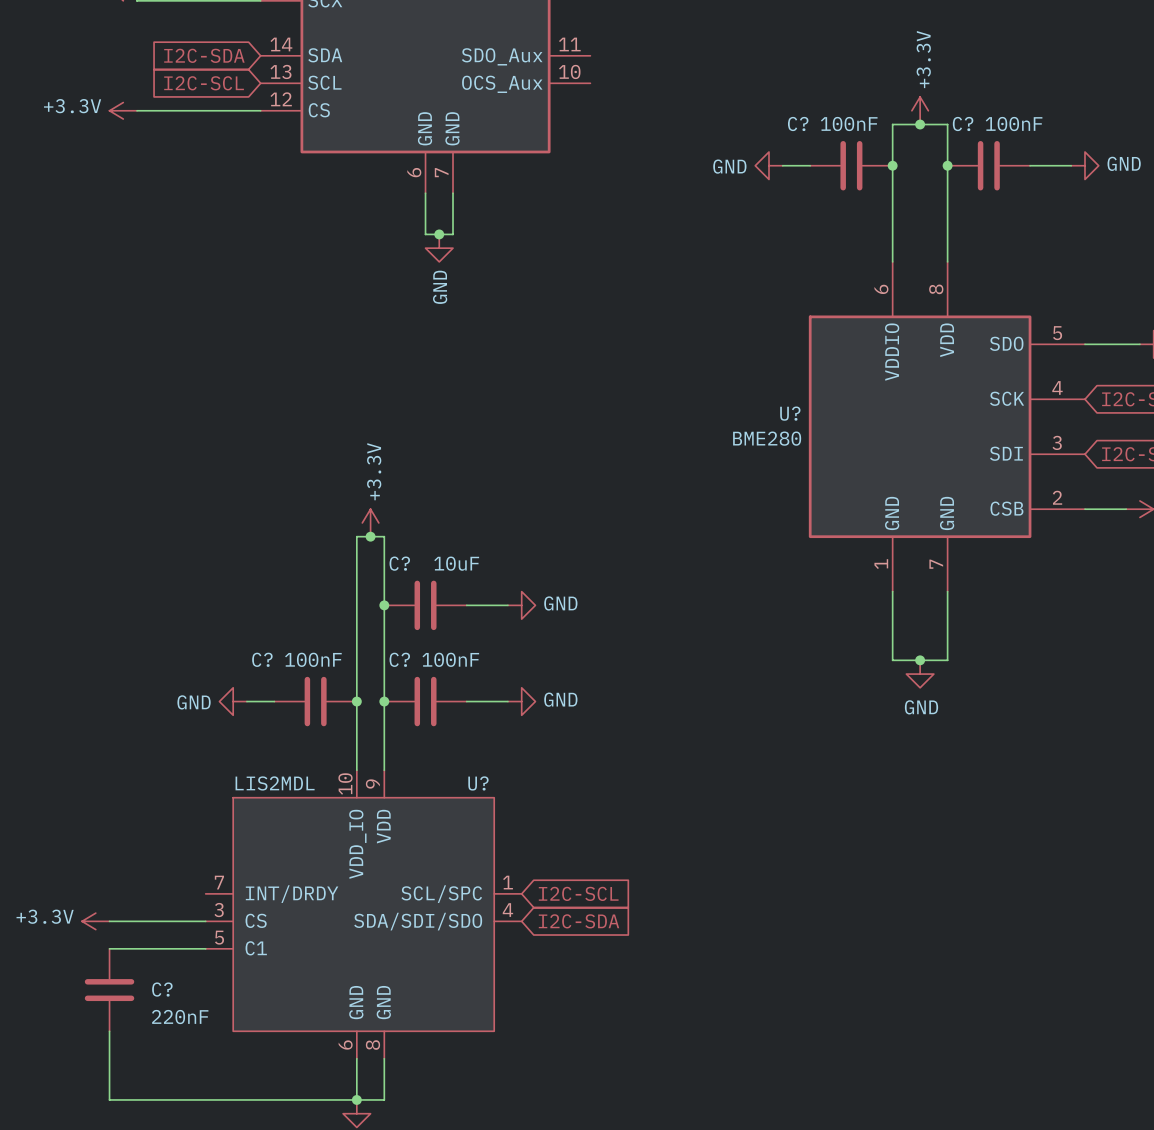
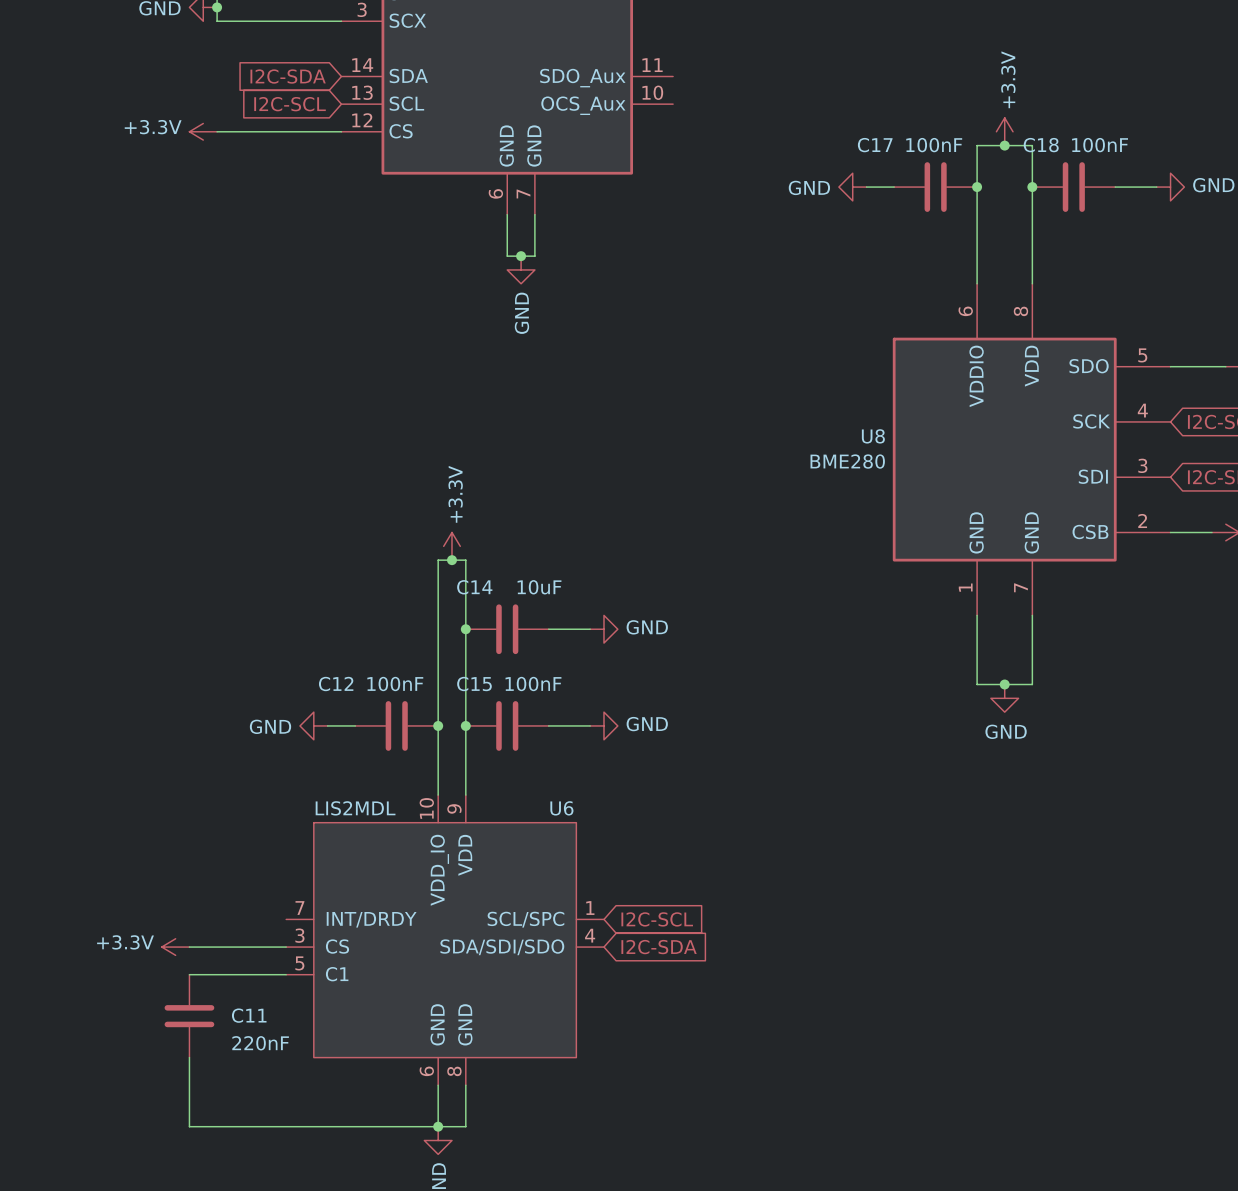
C? name: C? (798, 124) -> C17 (875, 145)
C? name: C? (963, 124) -> C18 (1041, 145)
U? name: U? (790, 413) -> U8 (873, 436)
C? name: C? (399, 563) -> C14 (474, 587)
C? name: C? (262, 659) -> C12 (336, 684)
C? name: C? (399, 659) -> C15 (474, 684)
U? name: U? (478, 783) -> U6 (561, 808)
C? name: C? (162, 989) -> C11 (249, 1015)

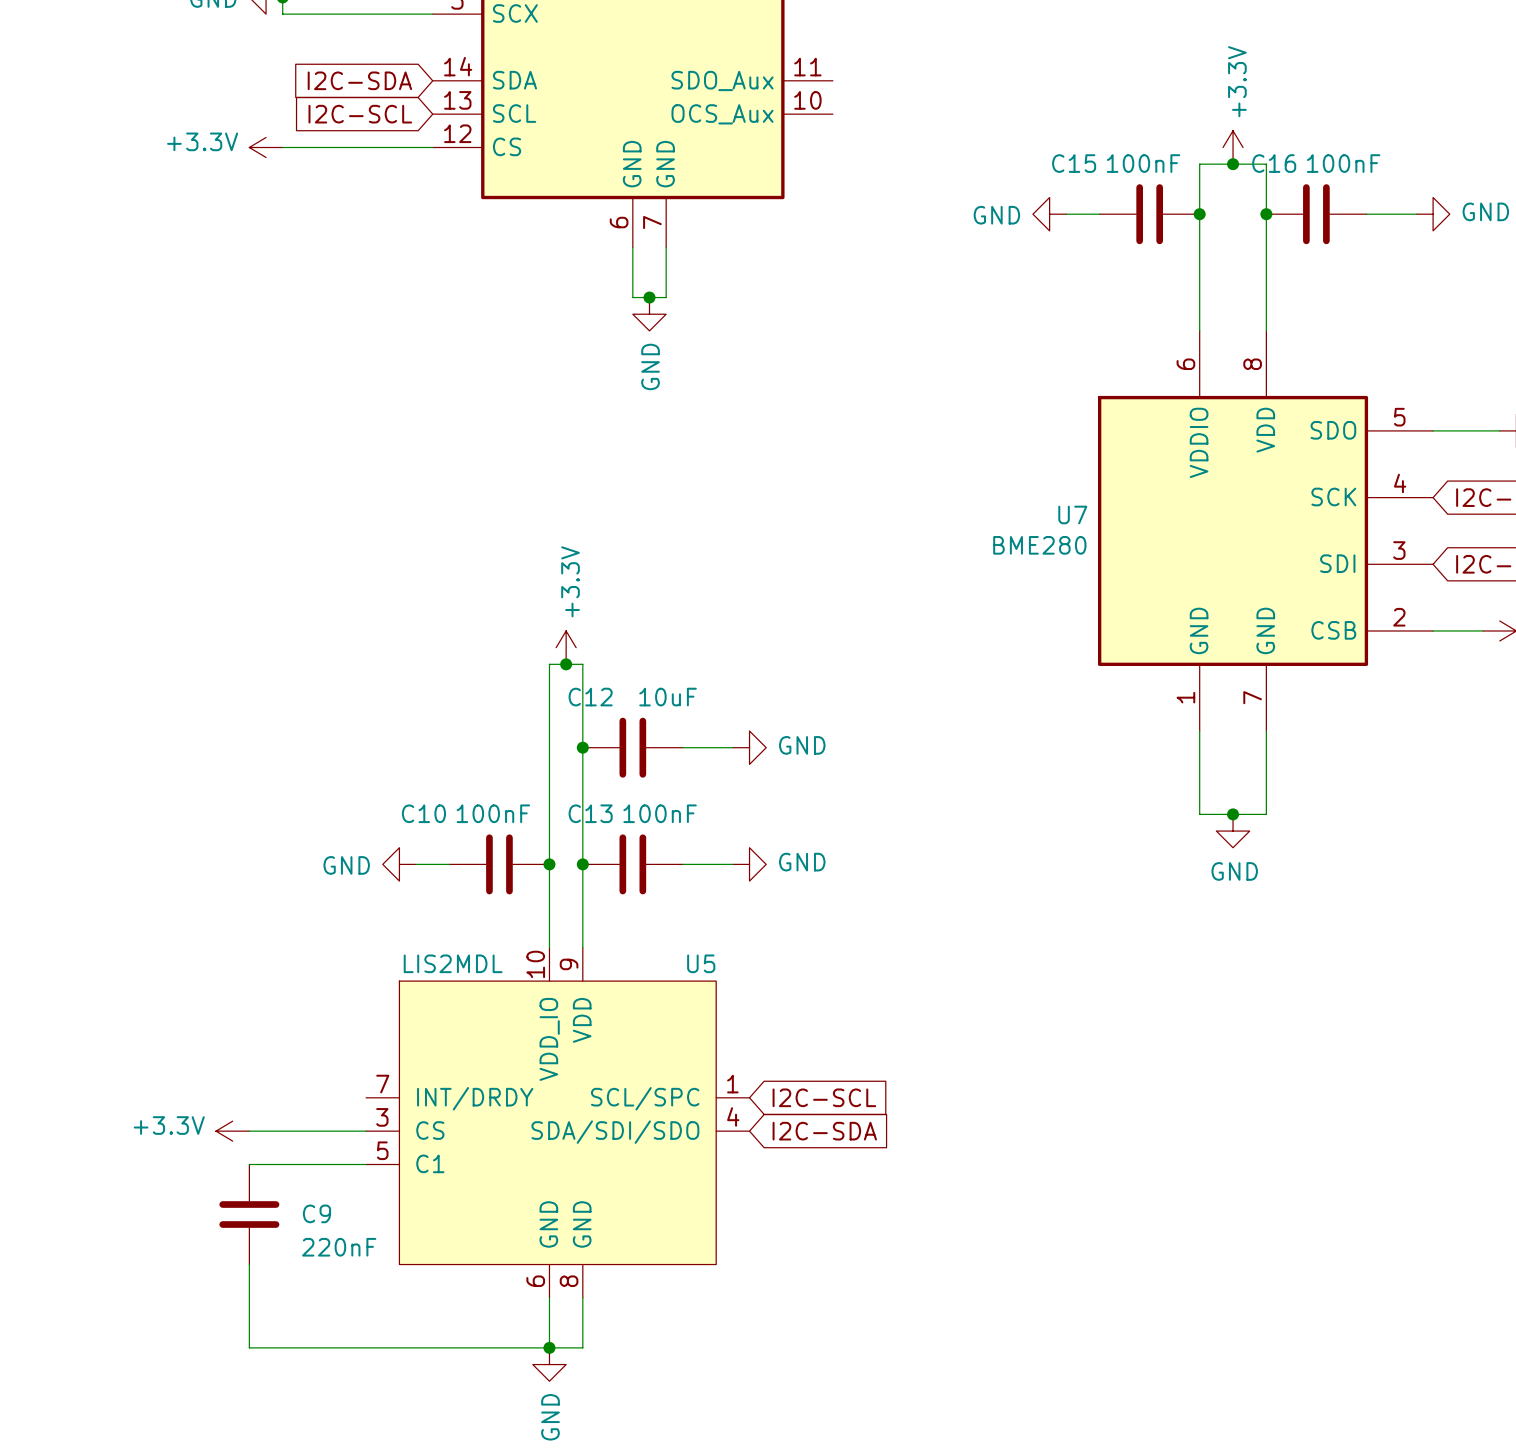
C17 name: C17 (875, 145) -> C15 (1074, 163)
C18 name: C18 (1041, 145) -> C16 (1274, 163)
U8 name: U8 (873, 436) -> U7 (1072, 515)
C14 name: C14 (474, 587) -> C12 (590, 697)
C12 name: C12 (336, 684) -> C10 (423, 813)
C15 name: C15 (474, 684) -> C13 (590, 813)
U6 name: U6 (561, 808) -> U5 (701, 963)
C11 name: C11 (249, 1015) -> C9 (316, 1213)

